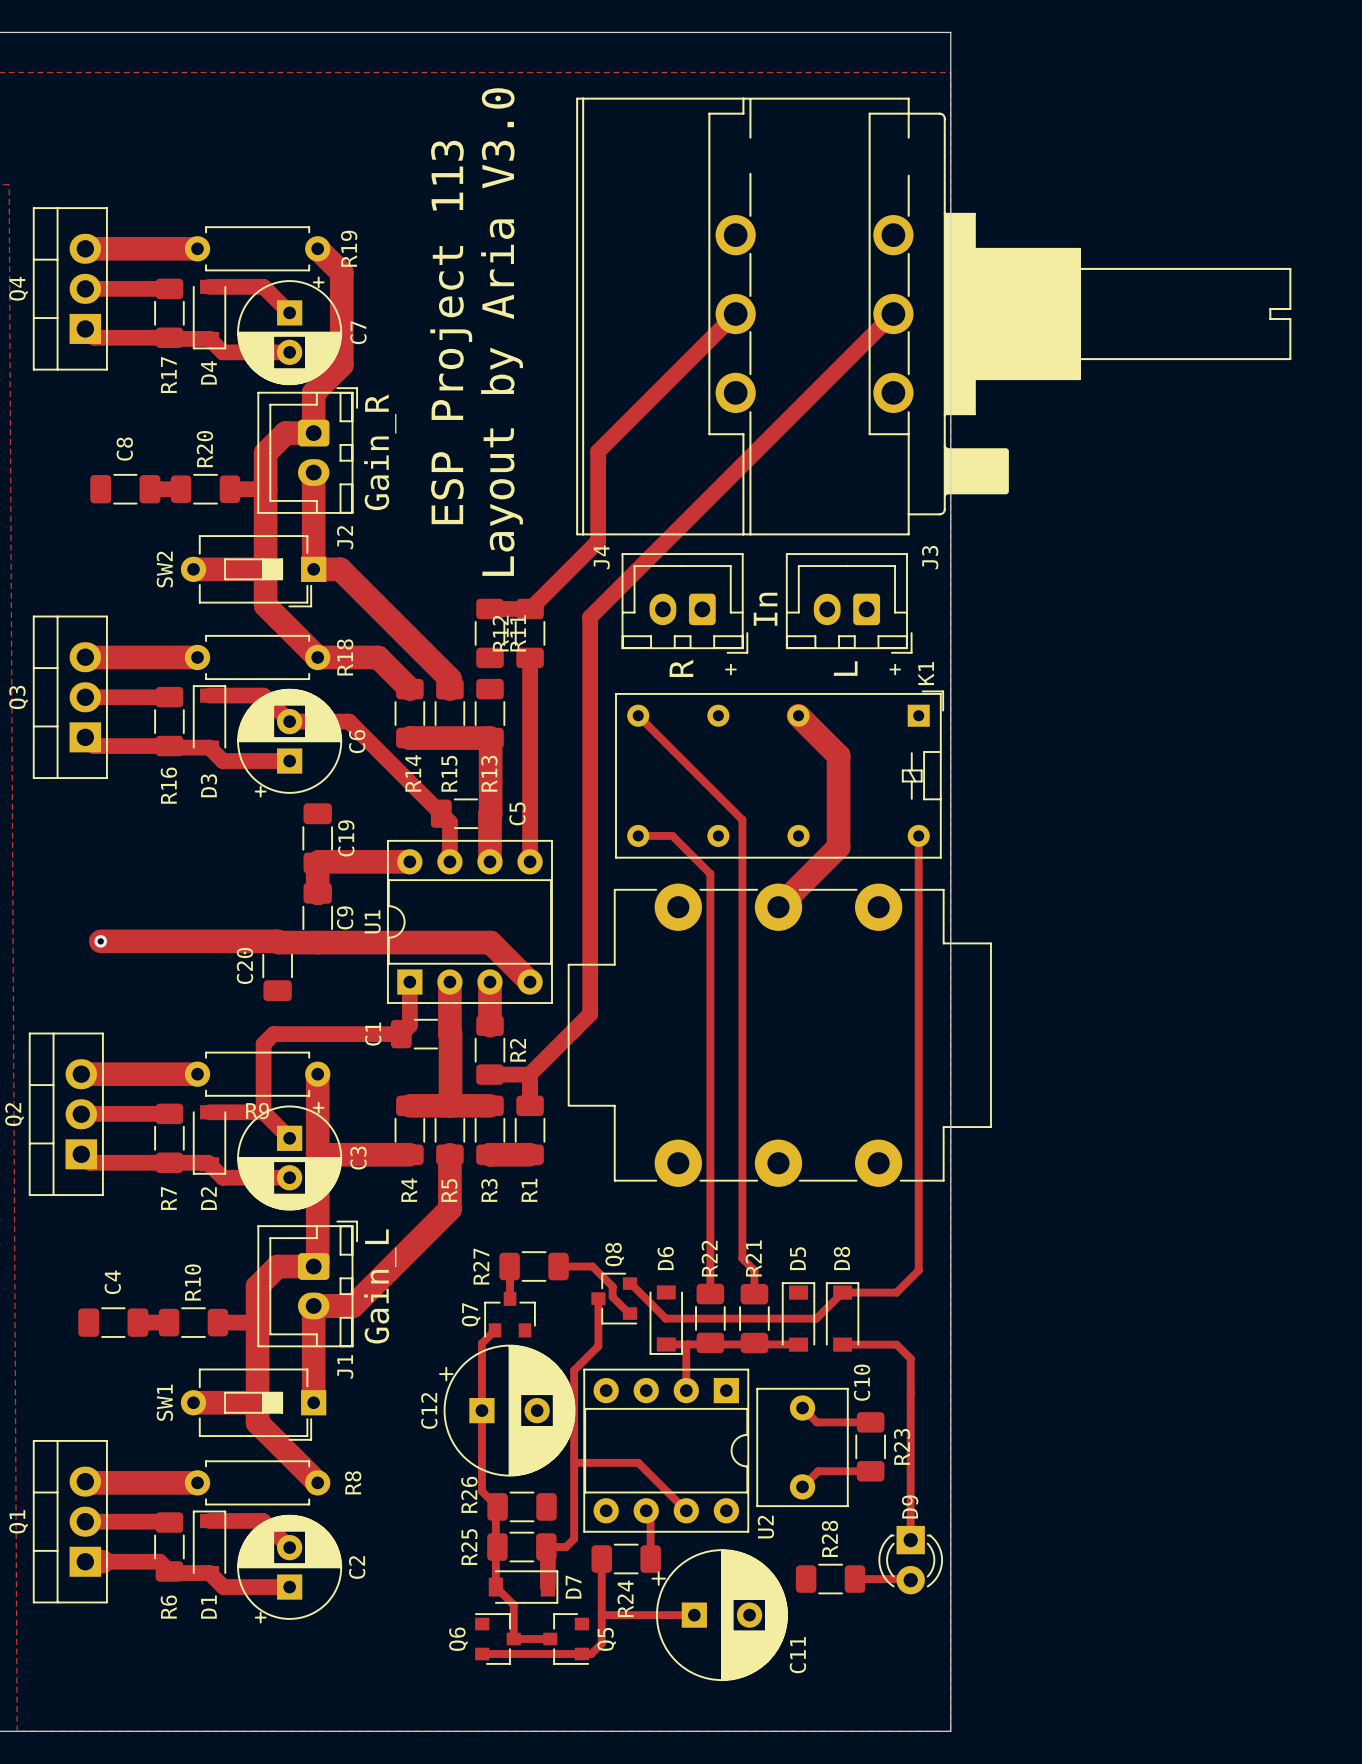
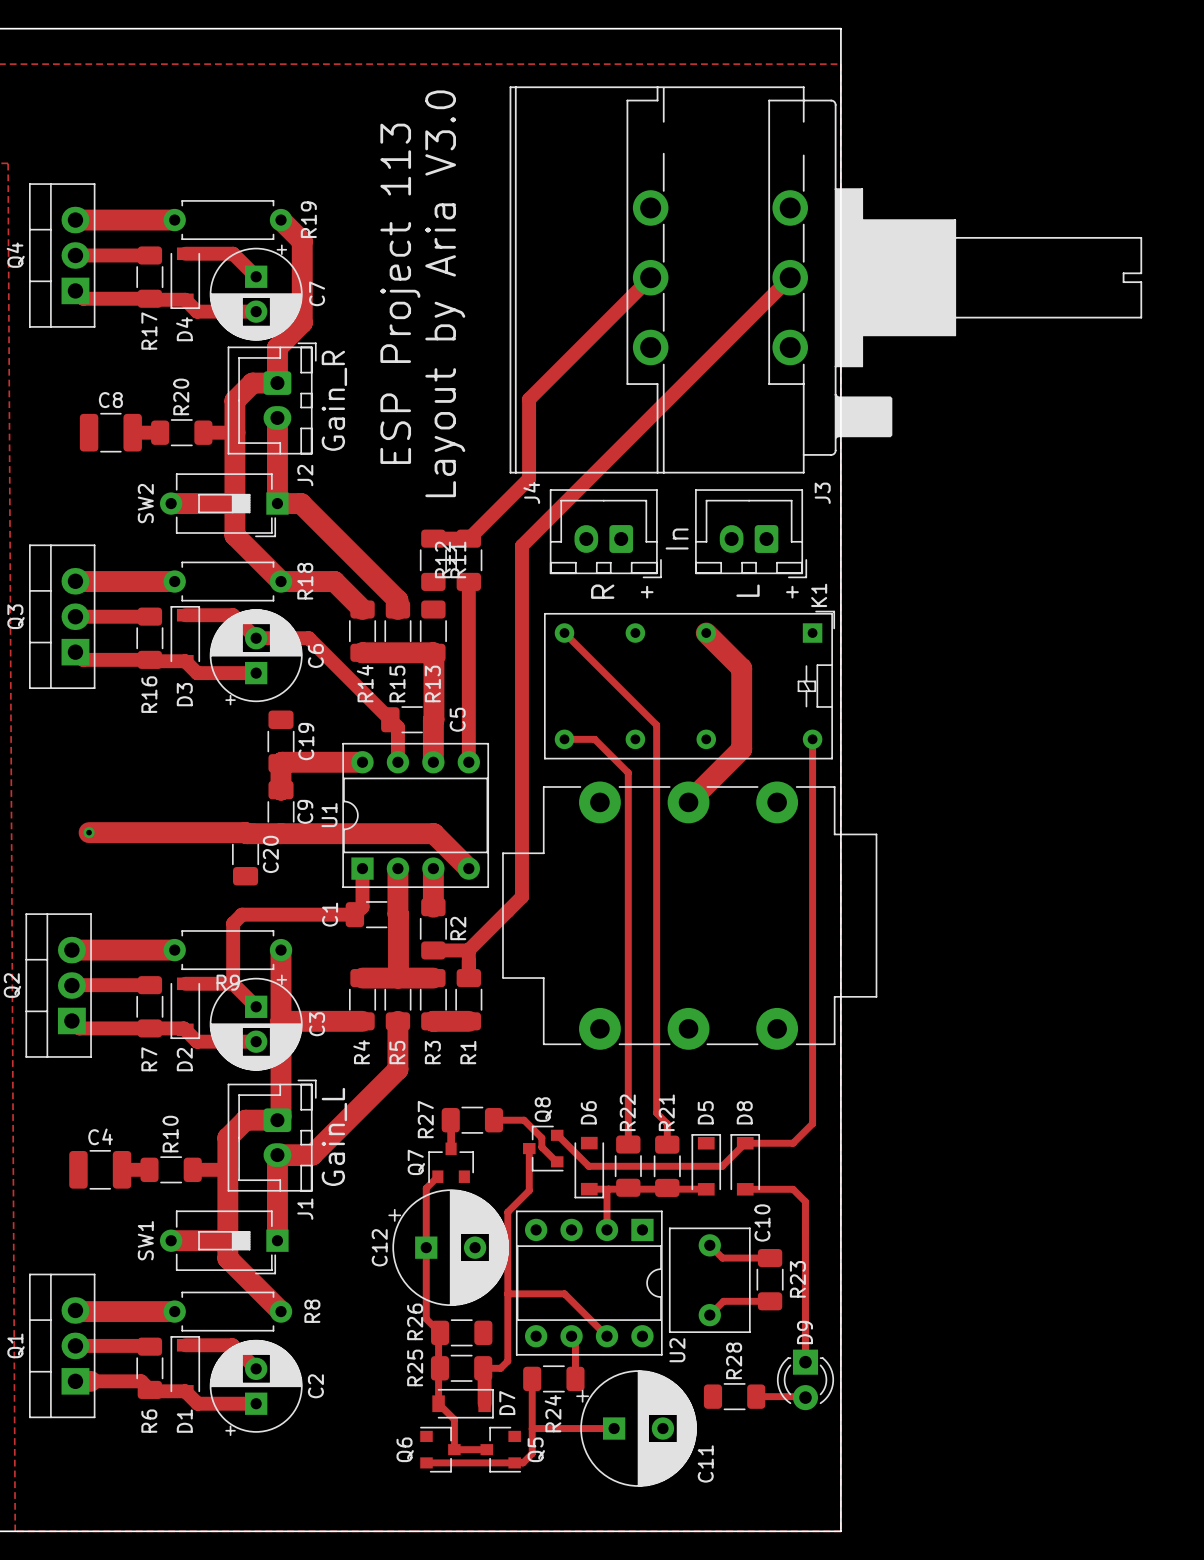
C8 name rotation: 0° (124, 449) -> 90° clockwise (110, 400)
C8 footprint: [90, 473, 161, 505] -> [79, 412, 142, 453]
C20 name position: C20 (245, 965) -> C20 (270, 854)
C4 name rotation: 0° (112, 1282) -> 90° clockwise (100, 1136)
C4 footprint: [78, 1307, 149, 1338] -> [69, 1150, 132, 1190]

